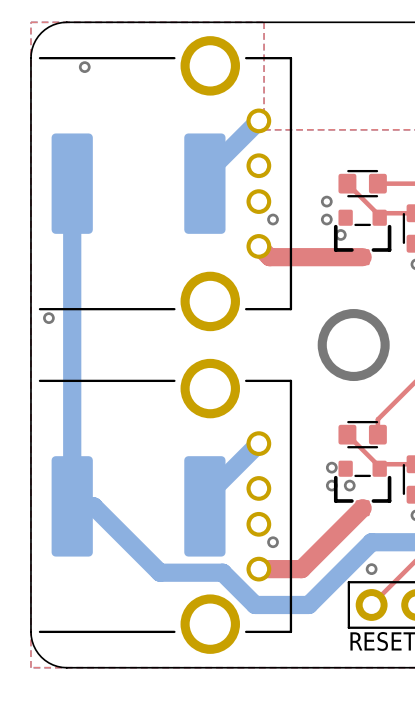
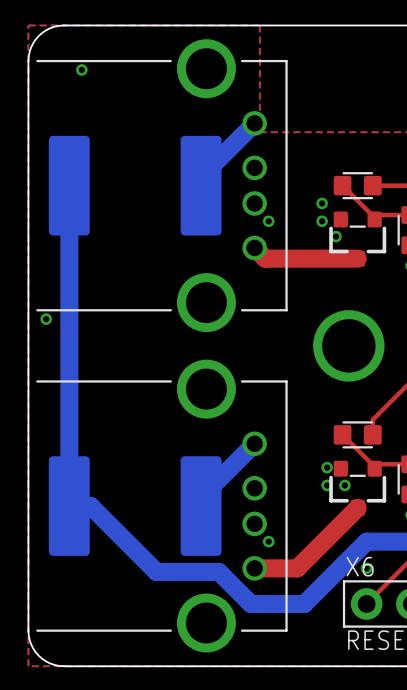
X6 name: none -> X6 (360, 566)

